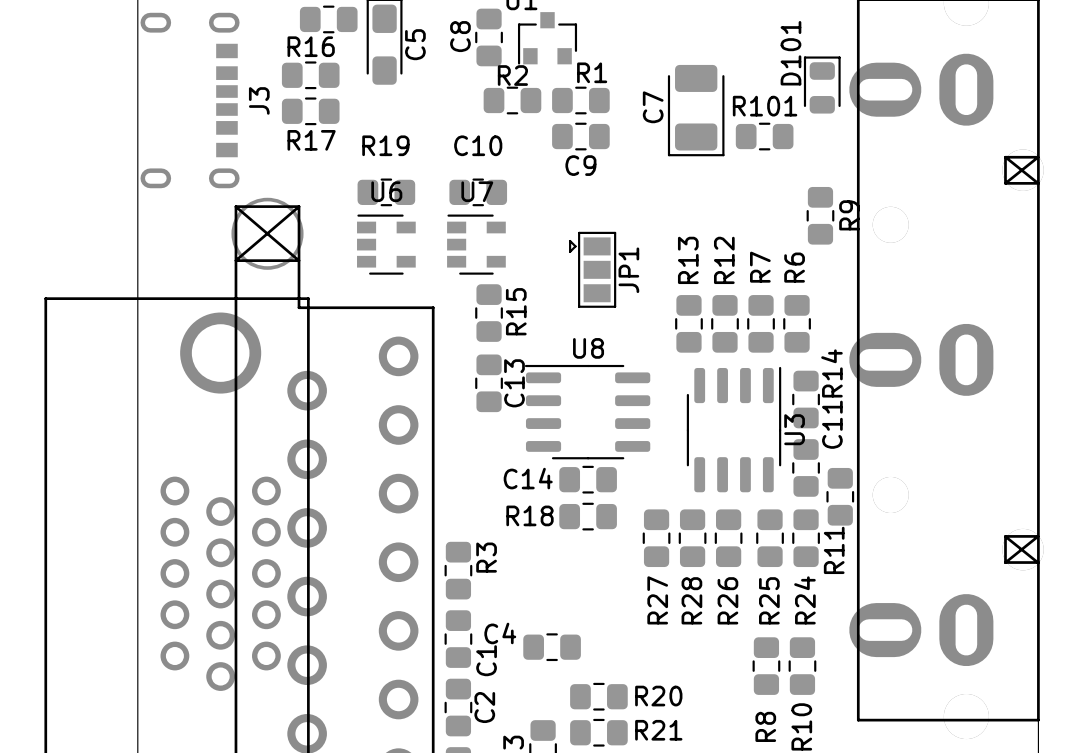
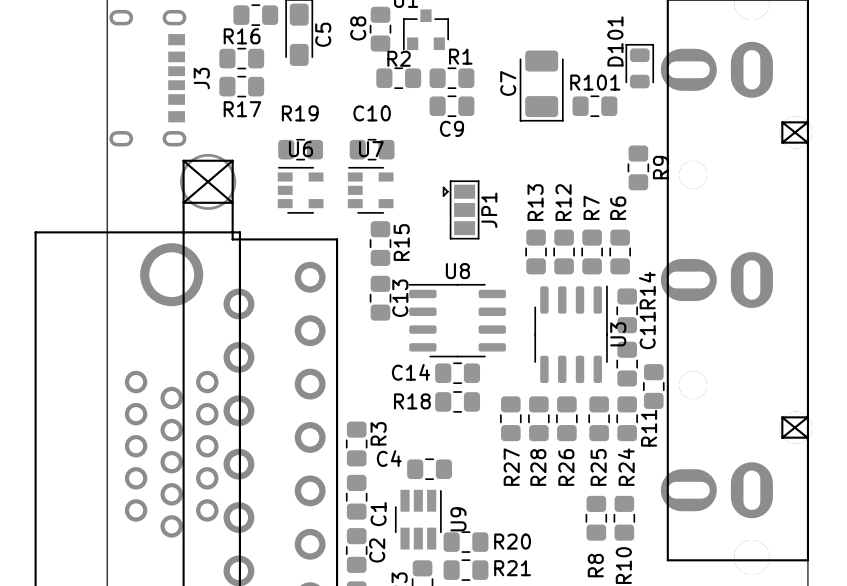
C4 position: (552, 647) -> (429, 469)
U9: none -> (418, 519)

